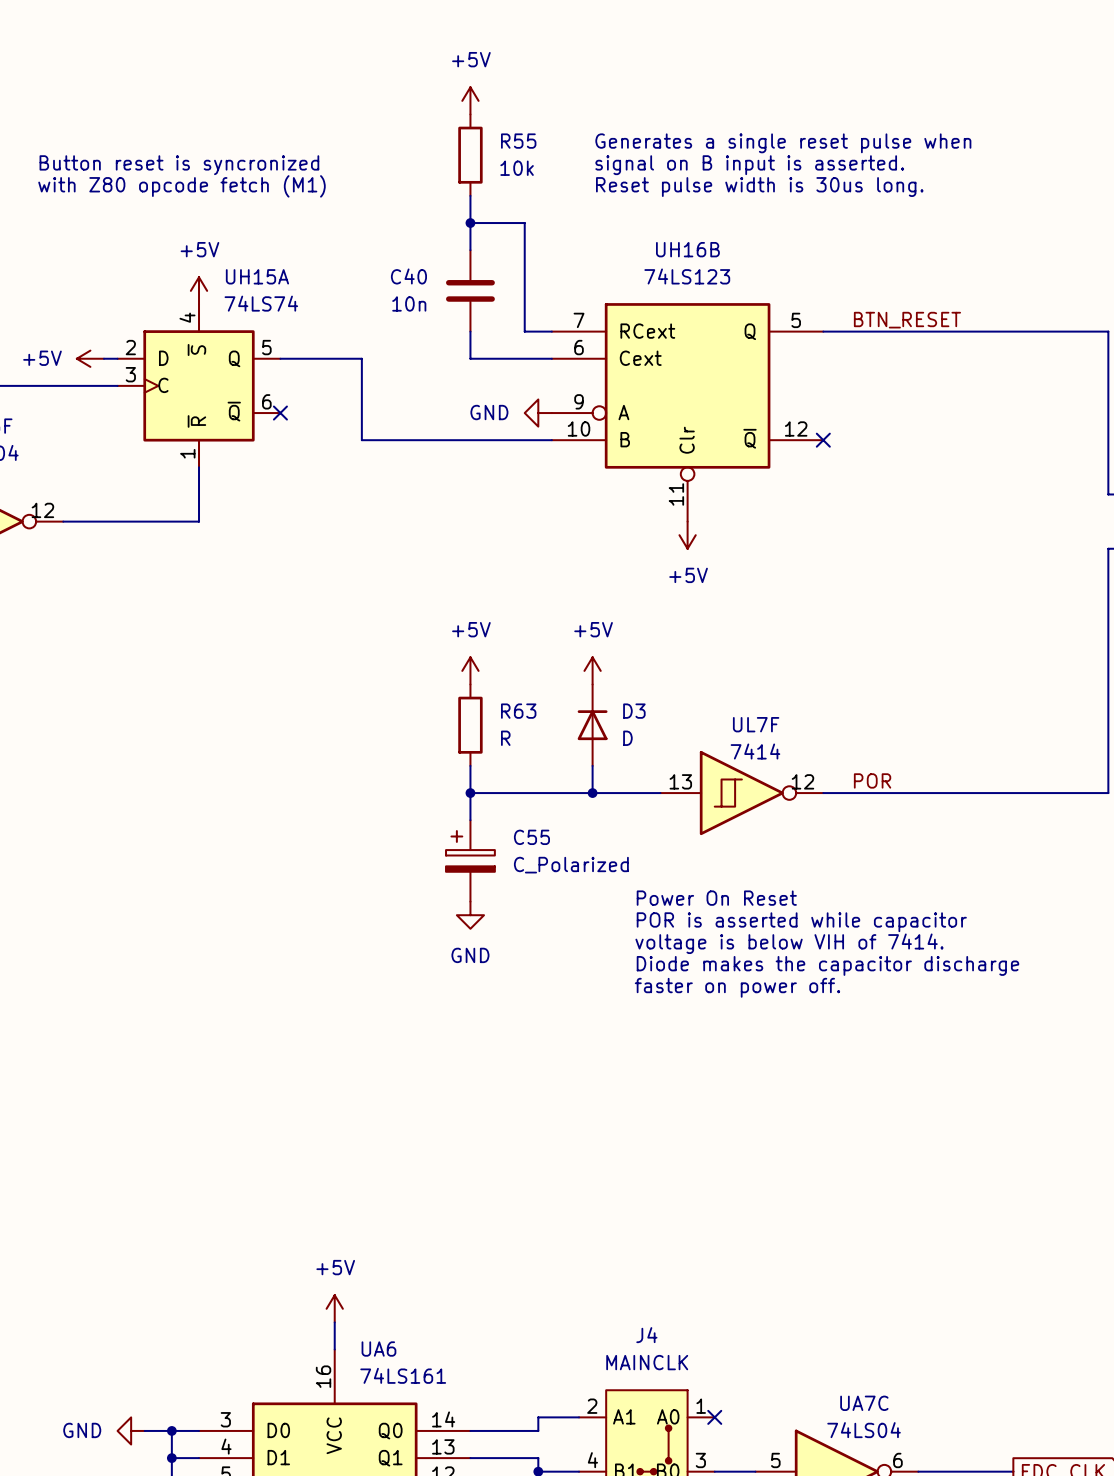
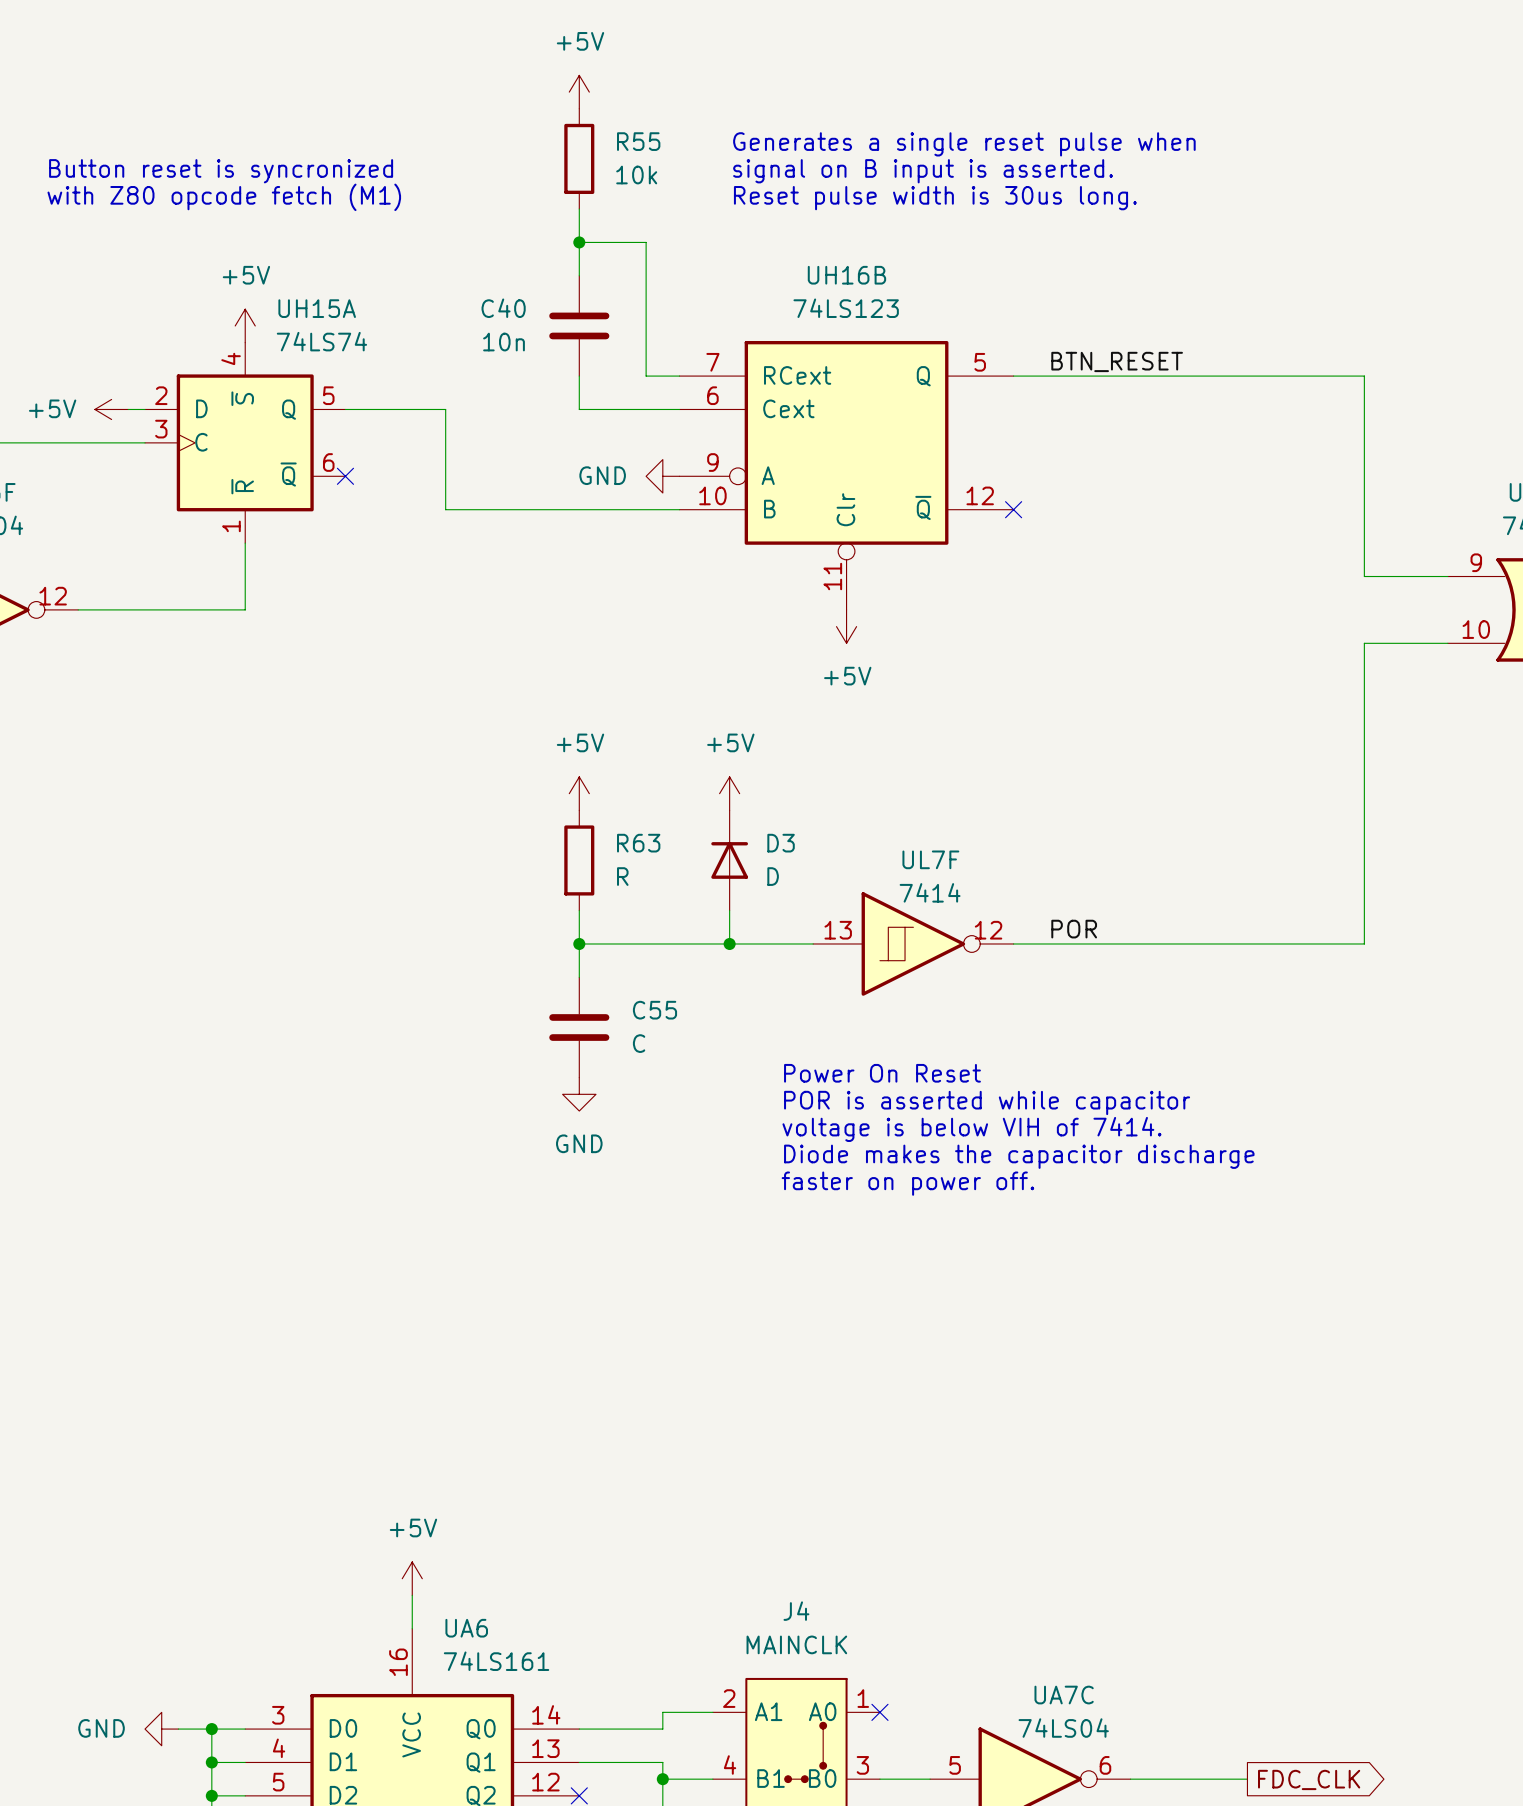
C55 symbol: [446, 820, 495, 902] -> [549, 977, 610, 1078]
C55 value: C_Polarized (571, 865) -> C (639, 1043)

